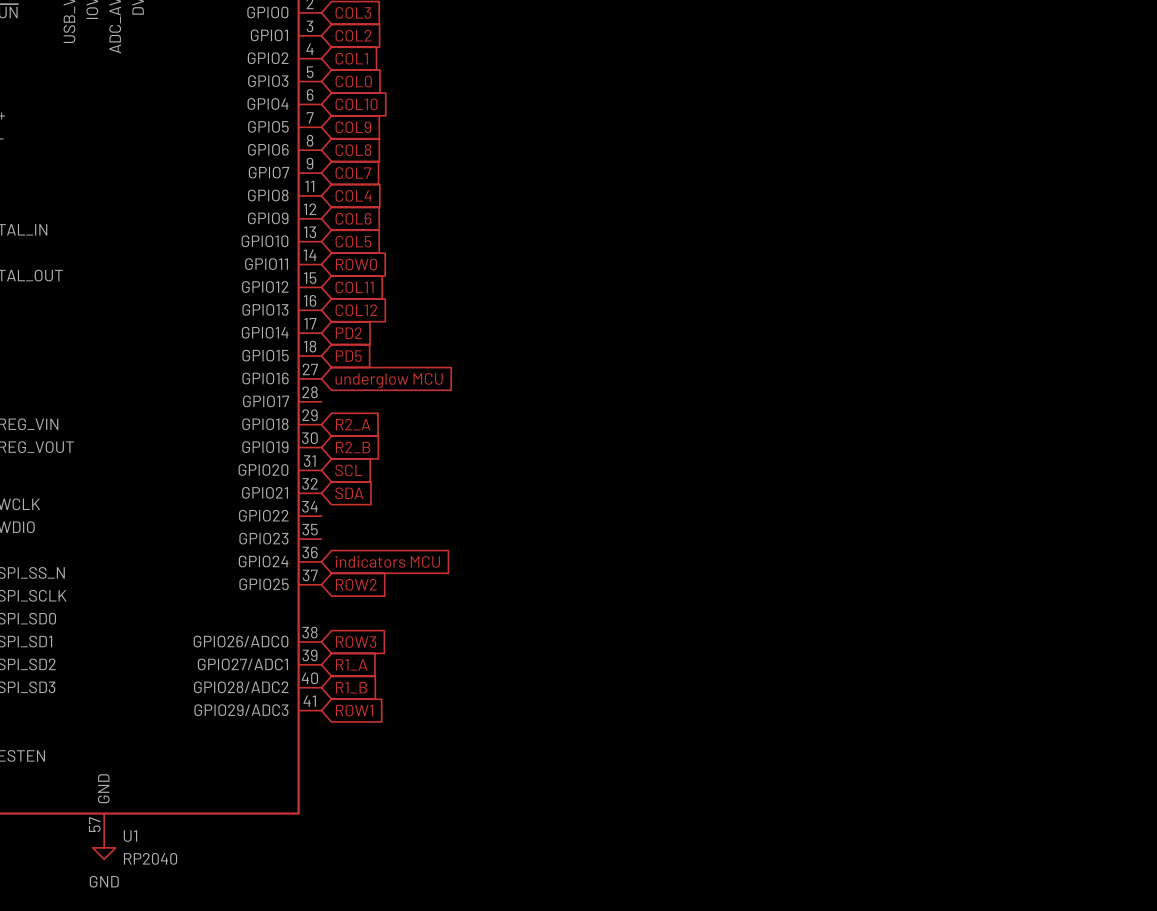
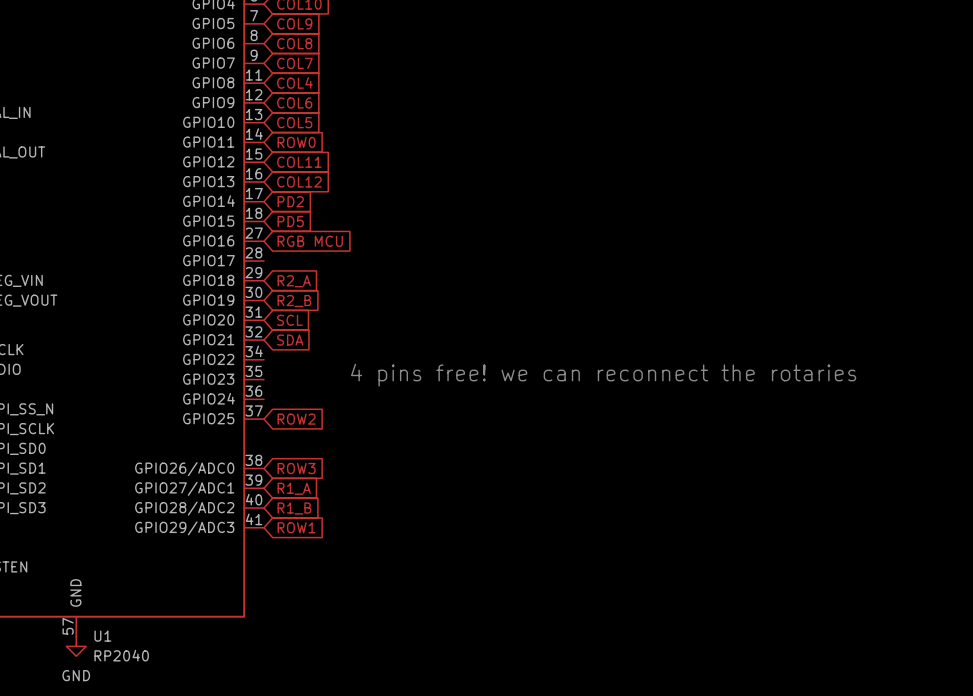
global label: underglow MCU (389, 380) -> RGB MCU (310, 241)
text: none -> 4 pins free! we can reconnect the rotaries (603, 375)
global label: indicators MCU (387, 561) -> none

